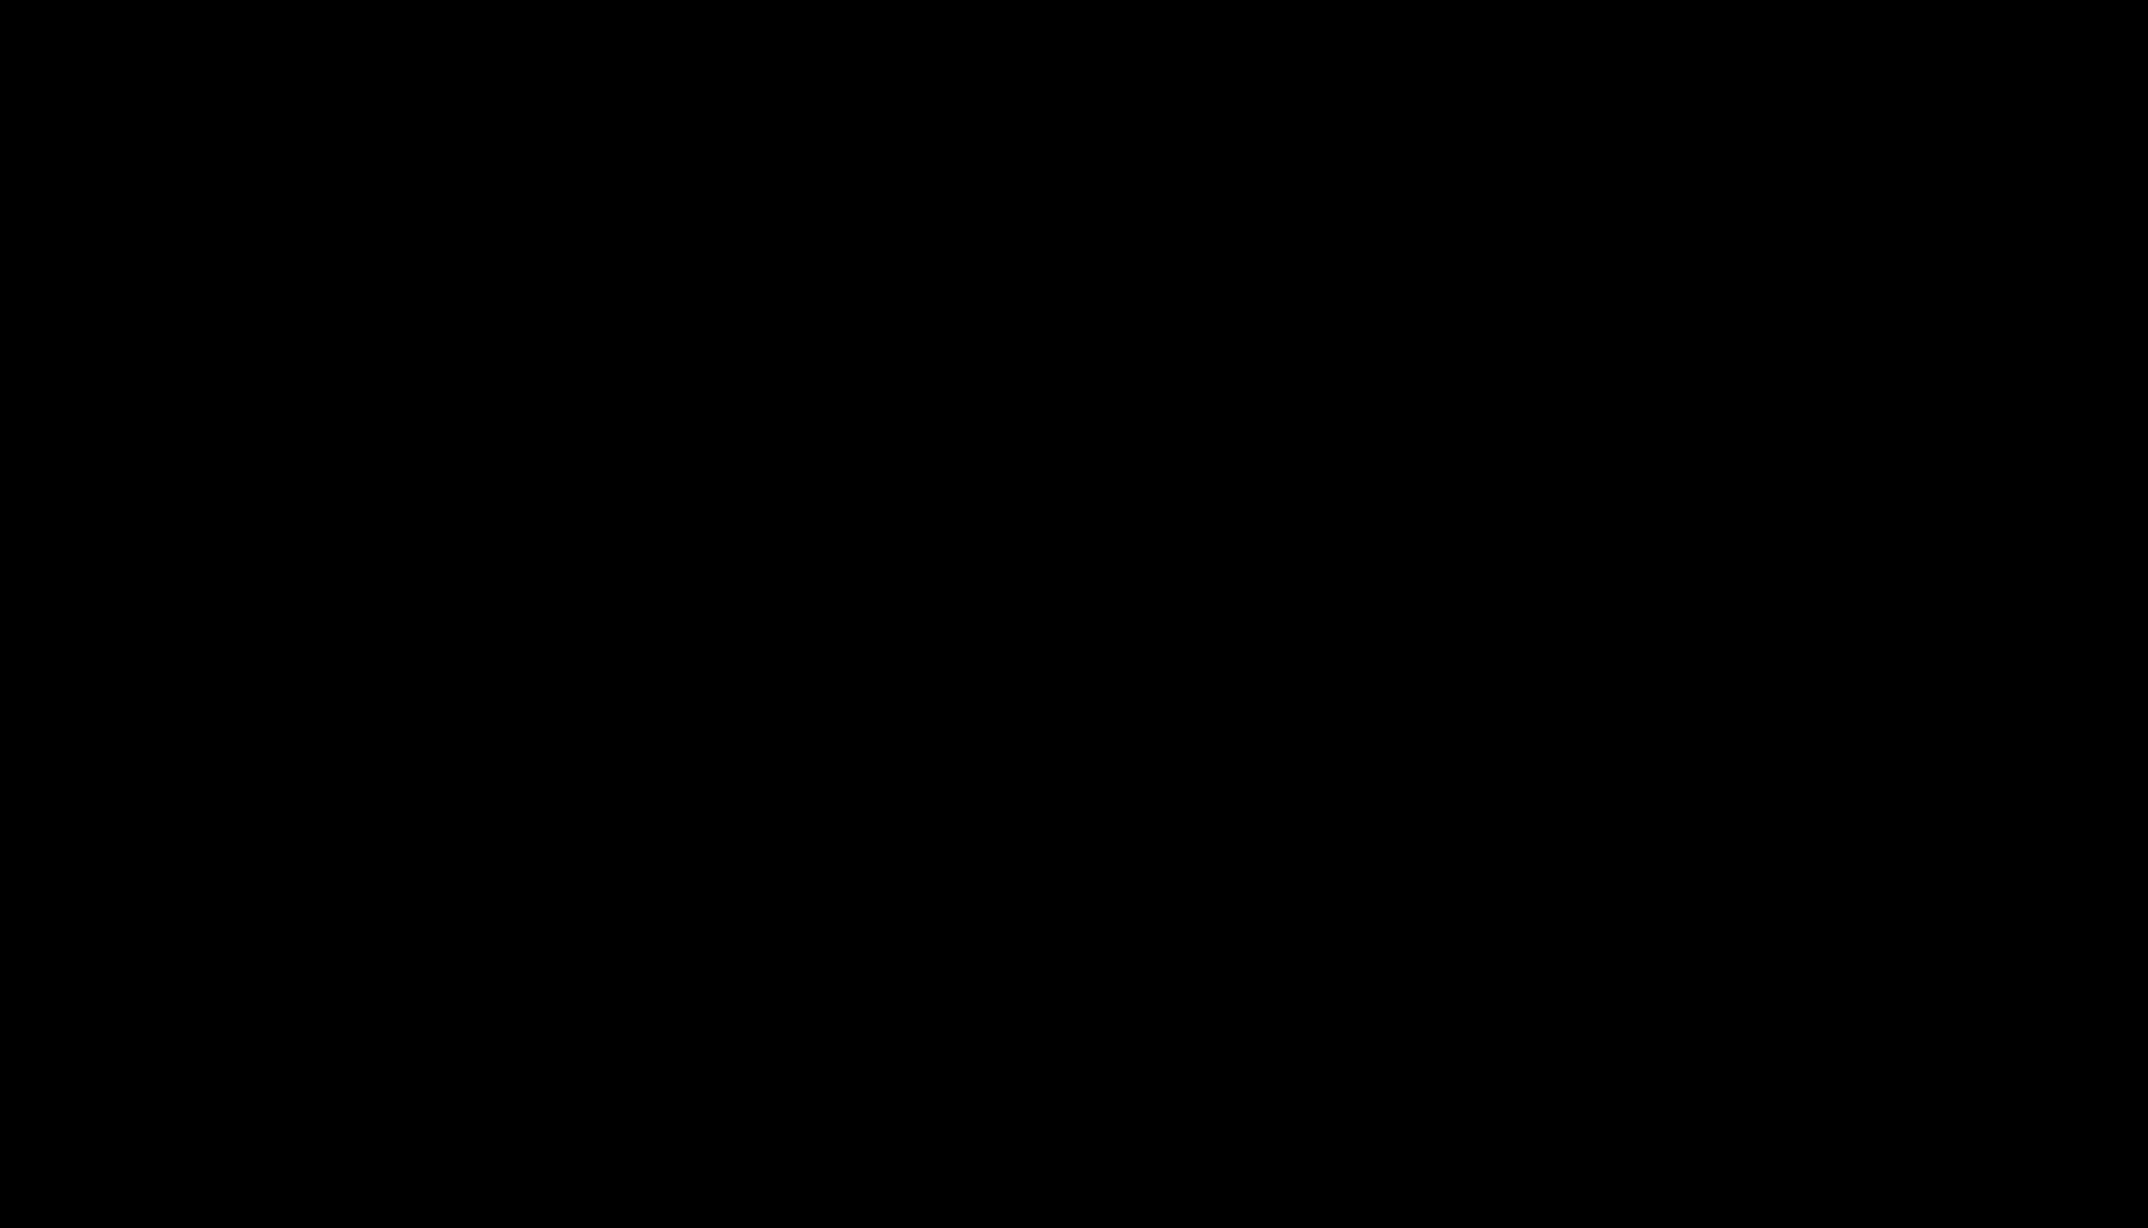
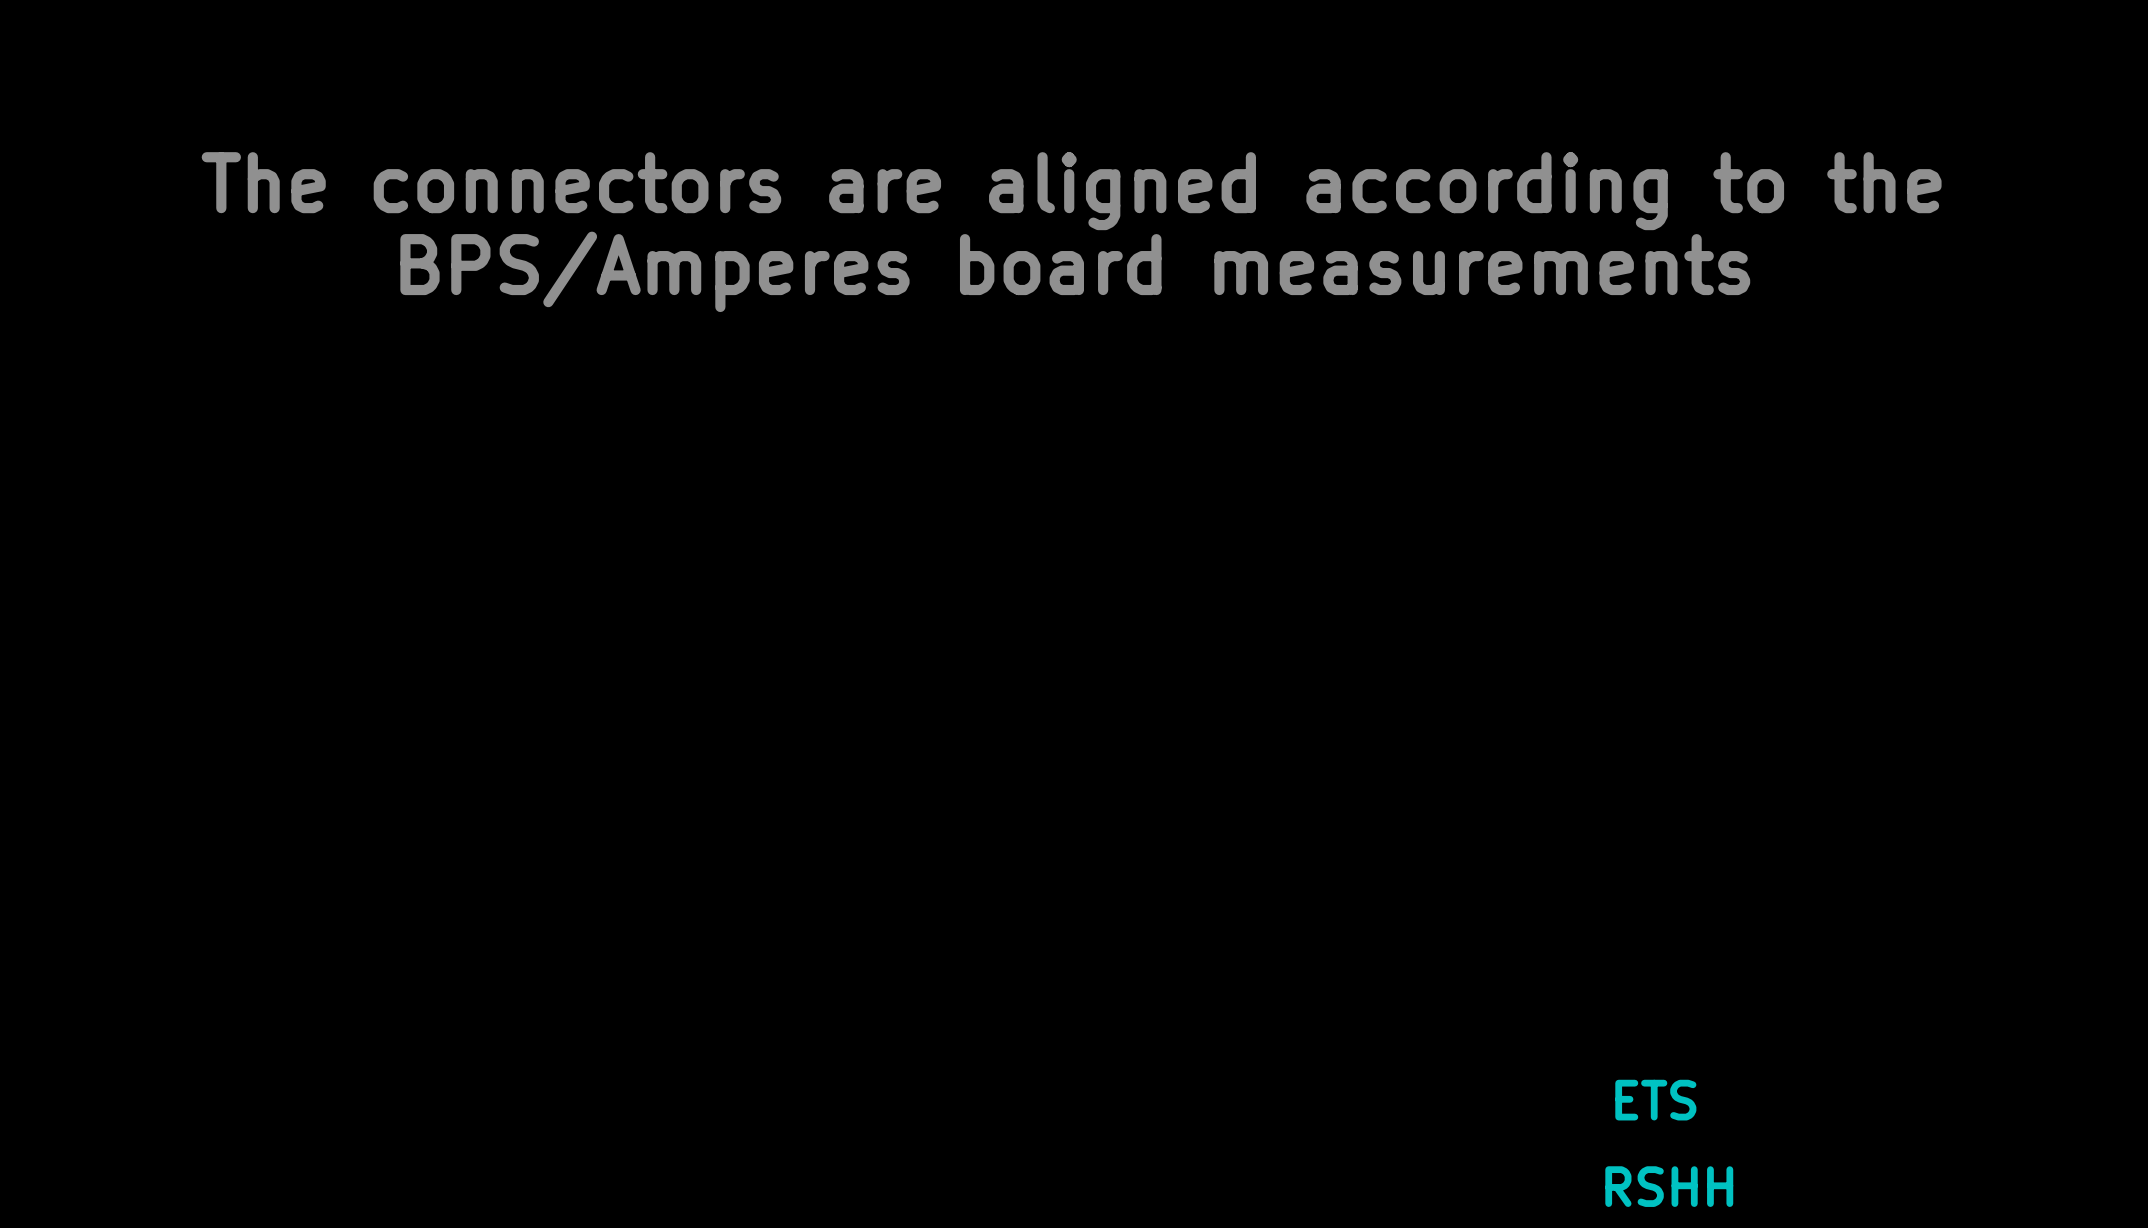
text: none -> The connectors are aligned according to the (1071, 191)
text: none -> BPS/Amperes board measurements (1075, 271)
text: none -> ETS (1655, 1100)
text: none -> RSHH (1669, 1186)

